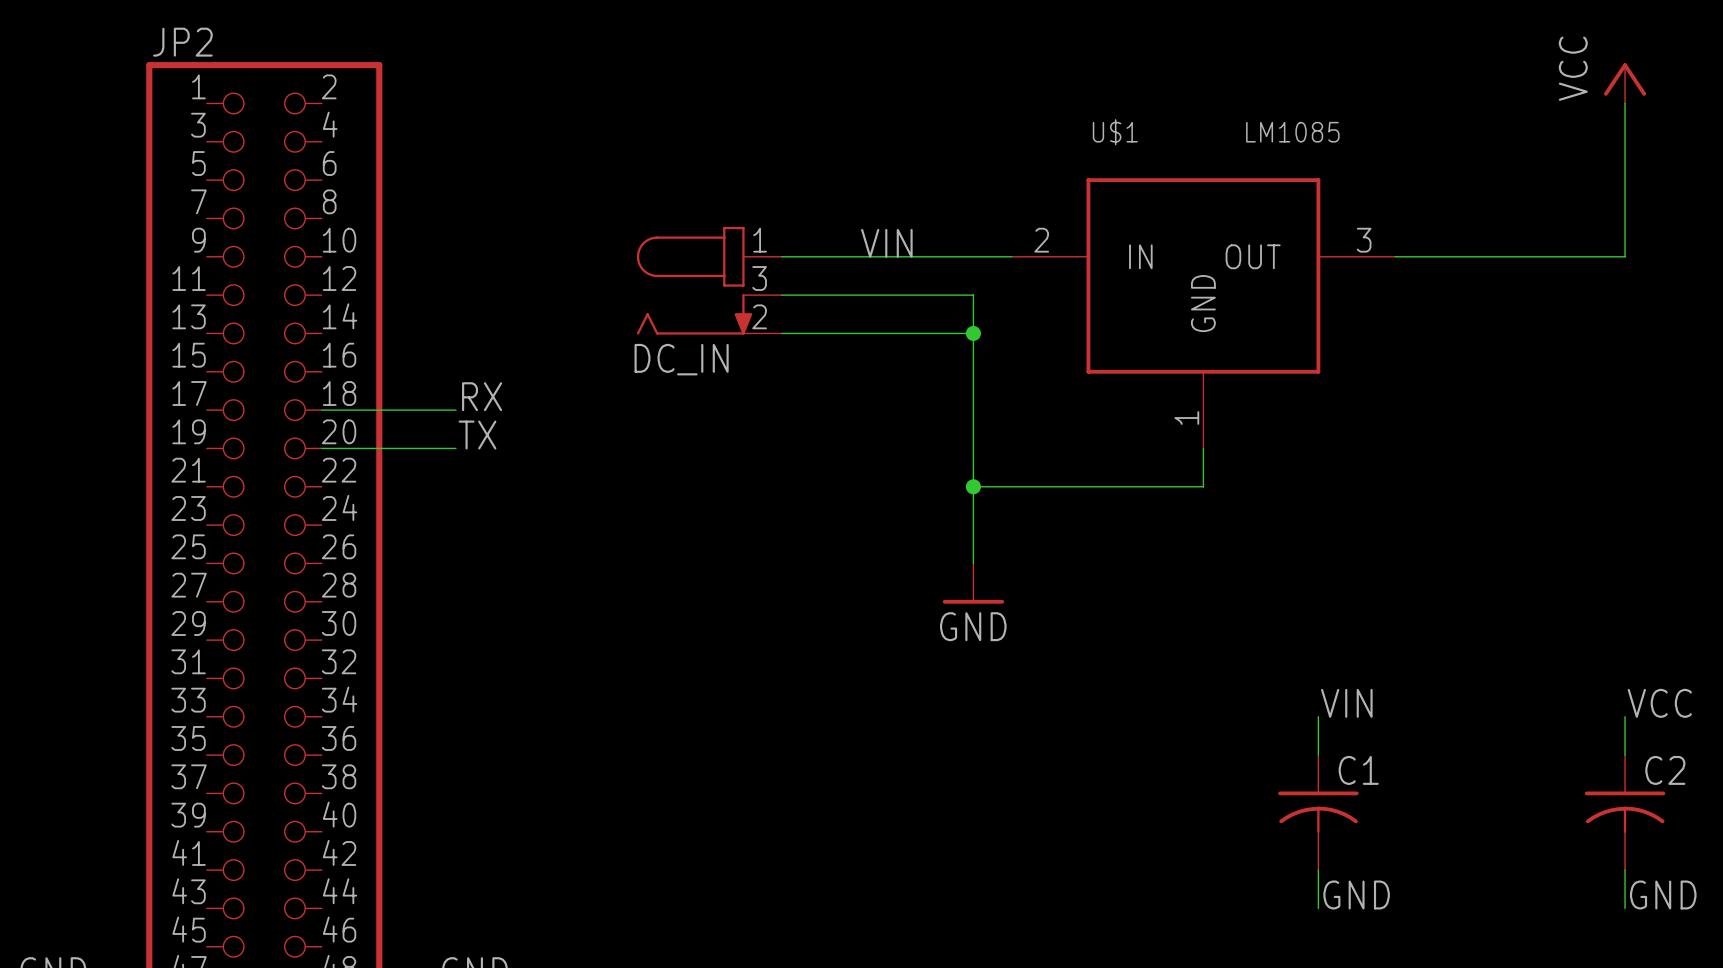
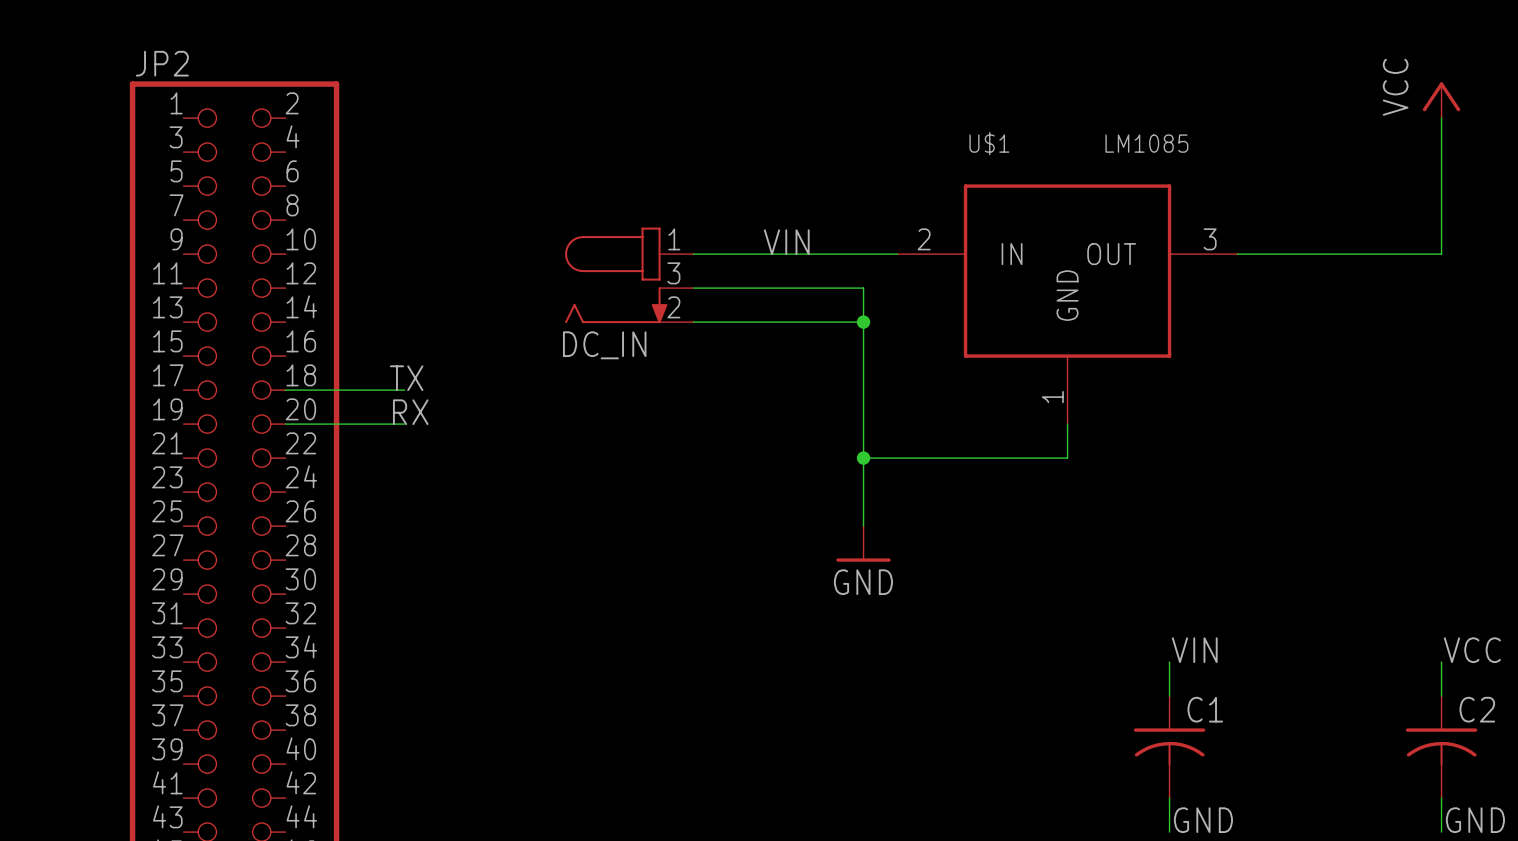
label position: RX (482, 396) -> RX (410, 412)
label position: TX (477, 435) -> TX (406, 378)

